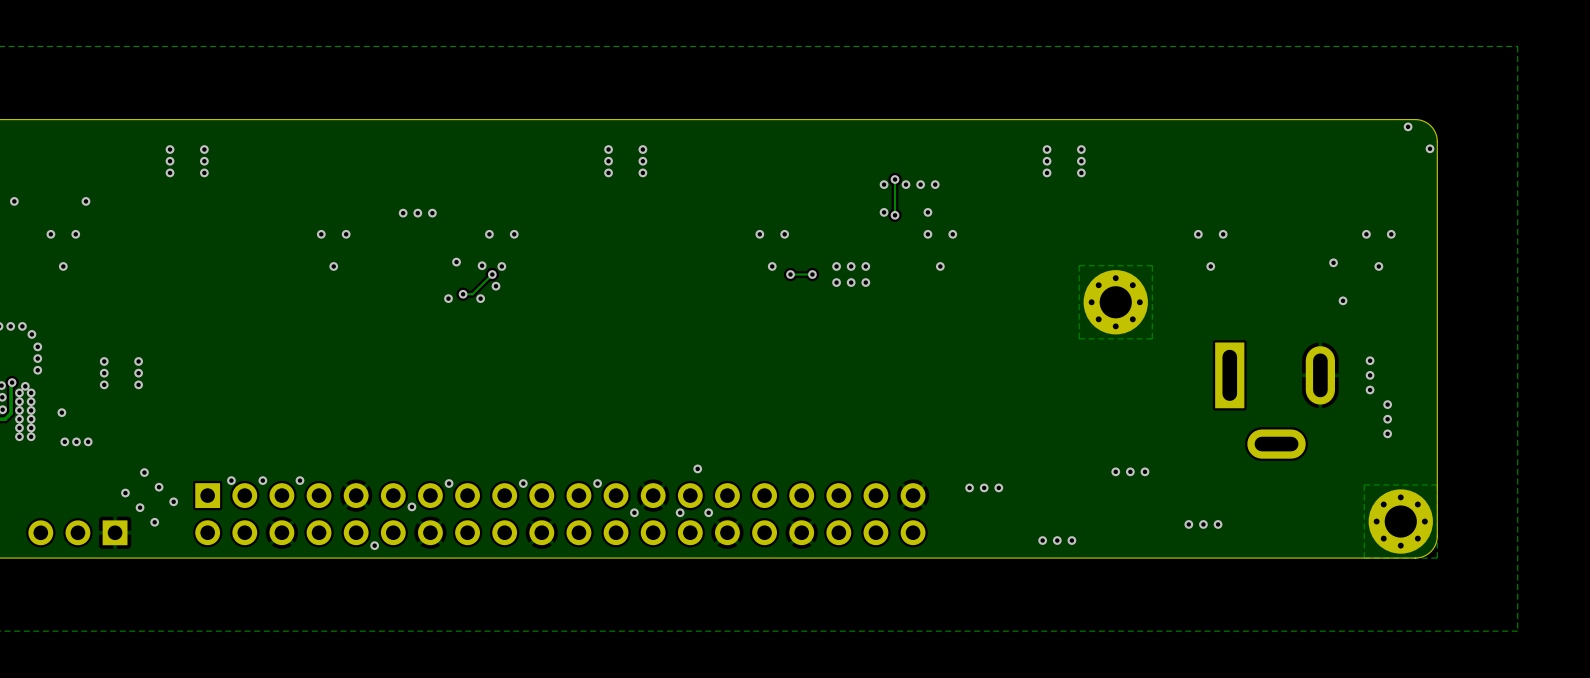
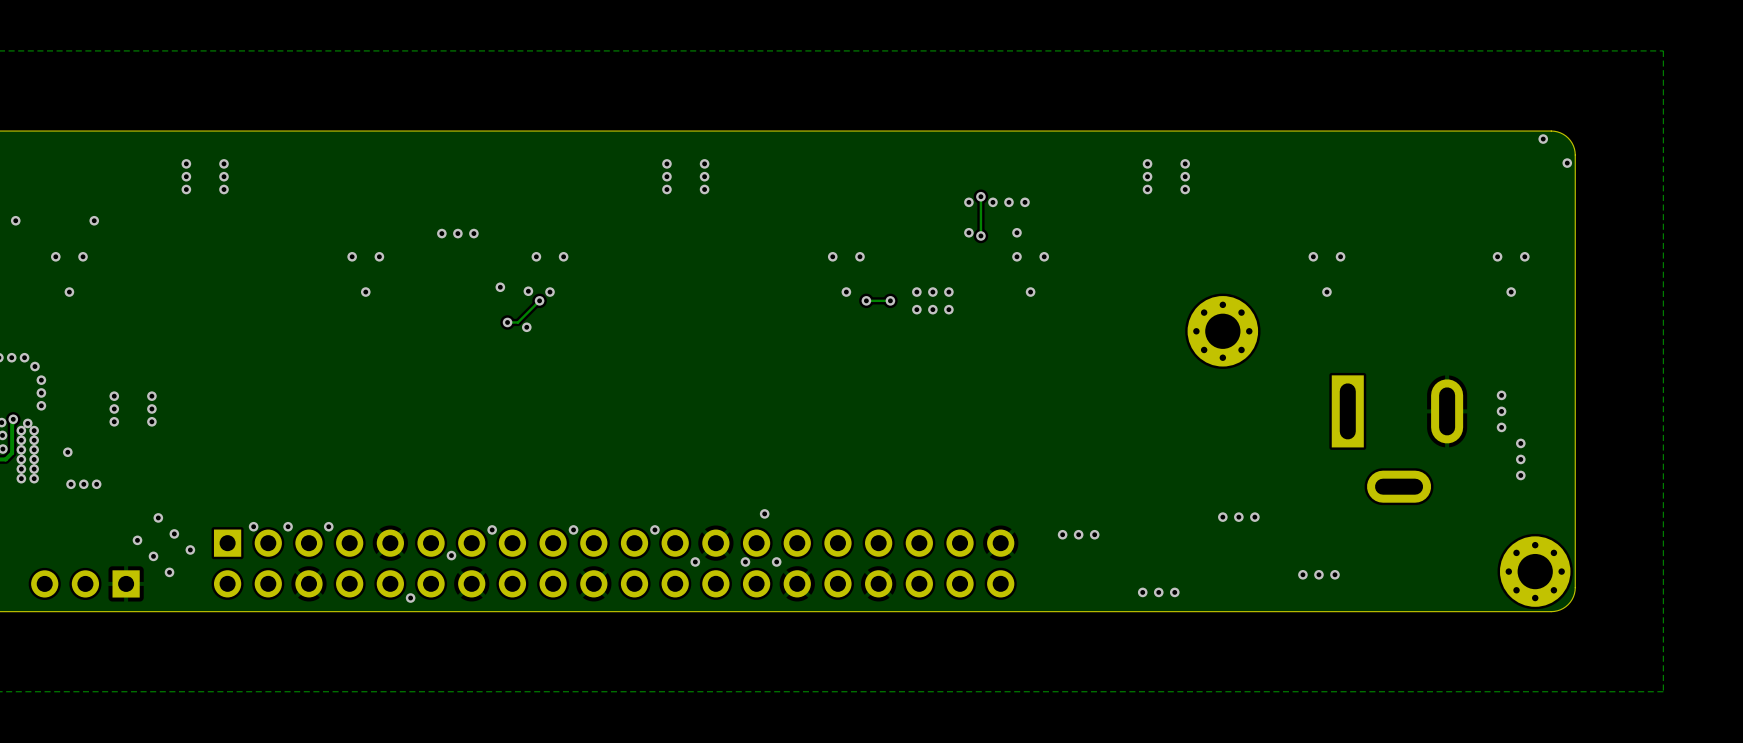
via: (1333, 262) -> none
zone outline: (1152, 265) (1152, 338) (1079, 338) (1079, 265) (1152, 265) -> none
via: (495, 286) -> none
via: (448, 298) -> none
via: (1343, 300) -> none
zone outline: (1437, 484) (1437, 558) (1364, 558) (1364, 484) (1437, 484) -> none

